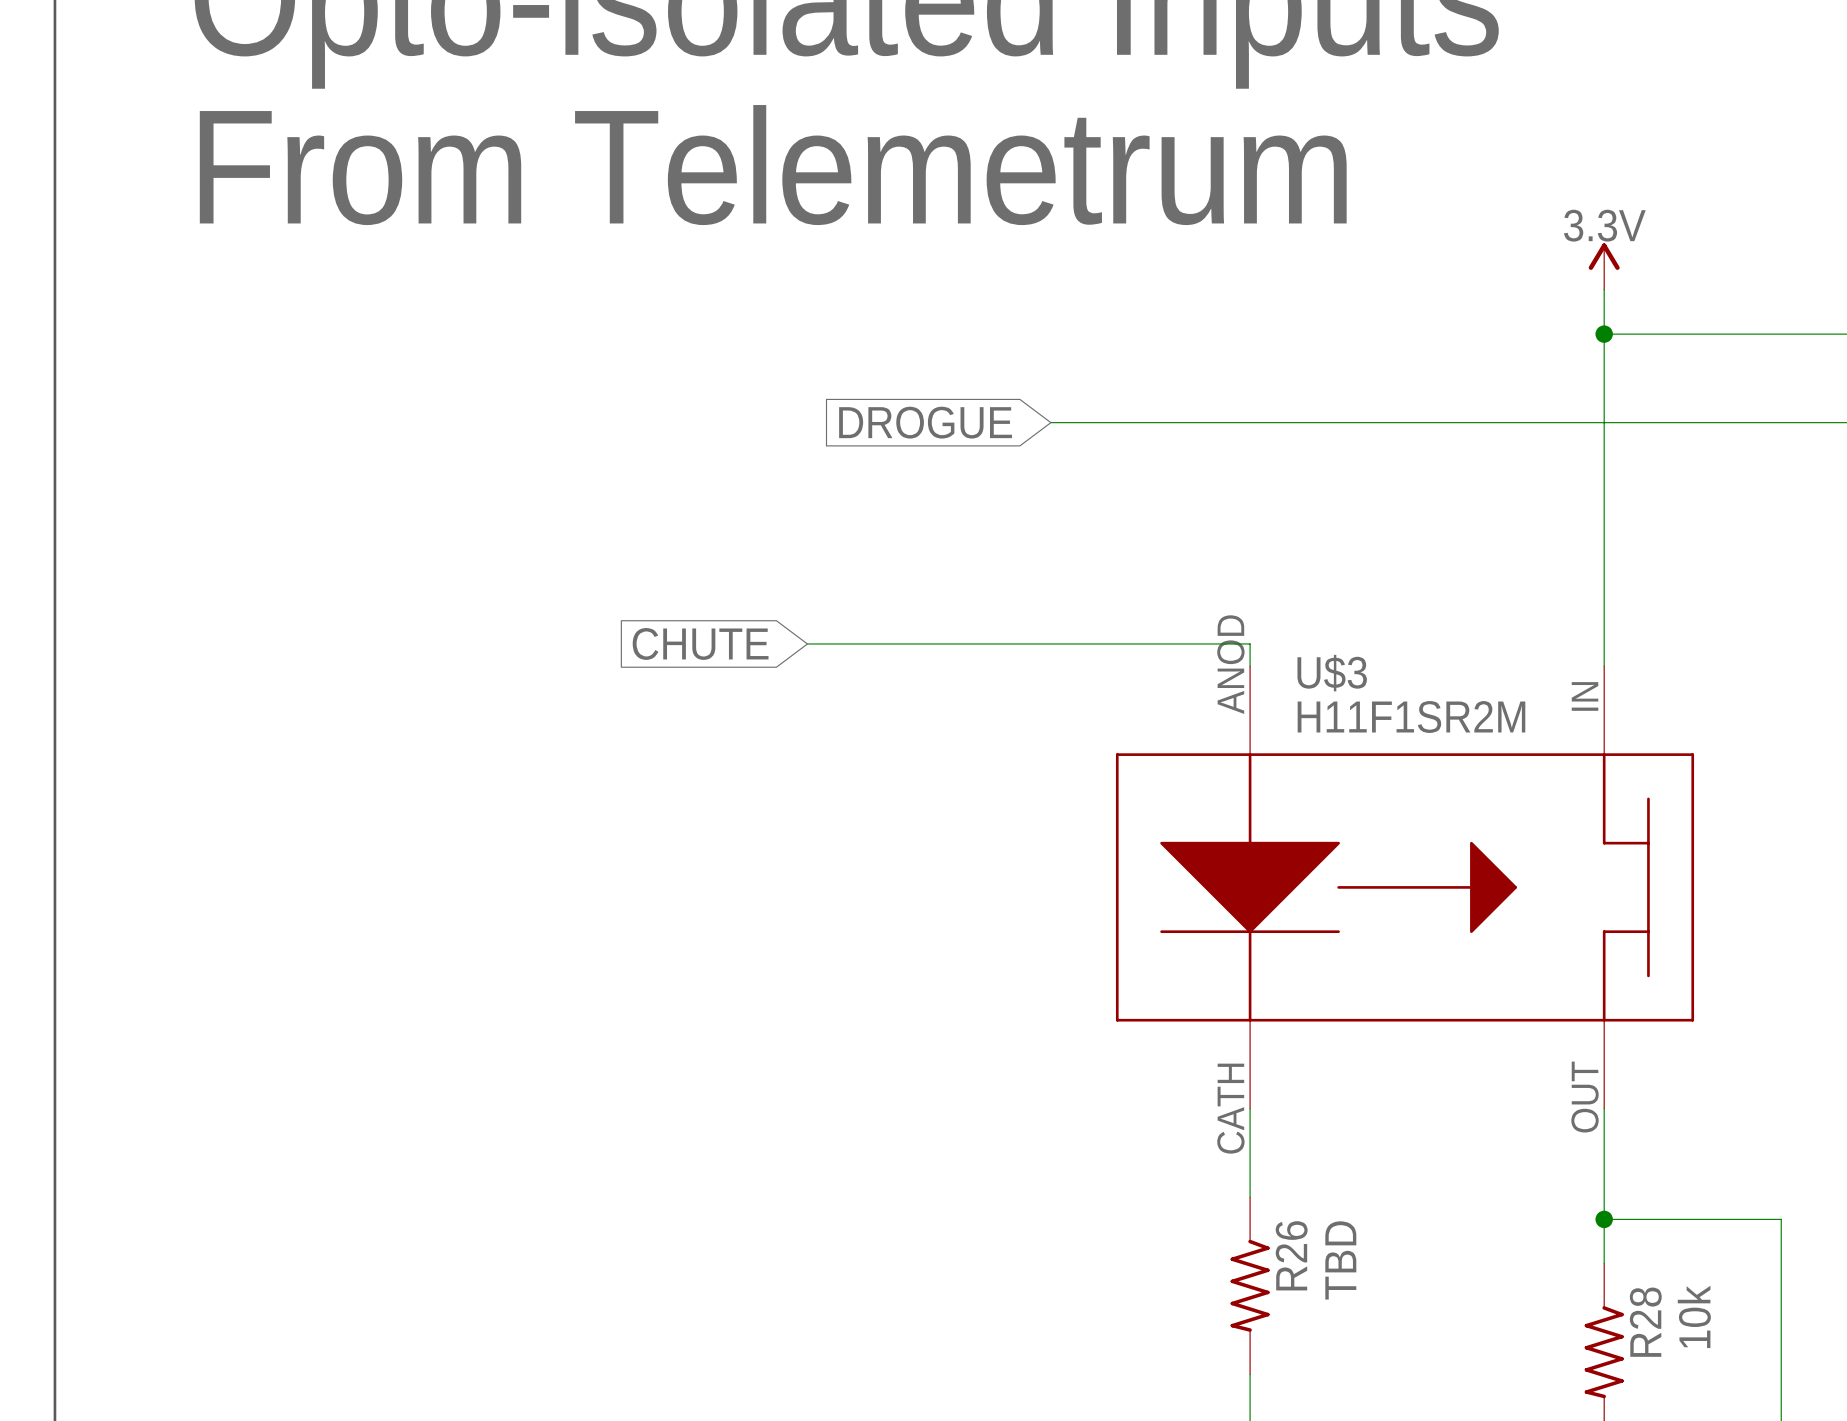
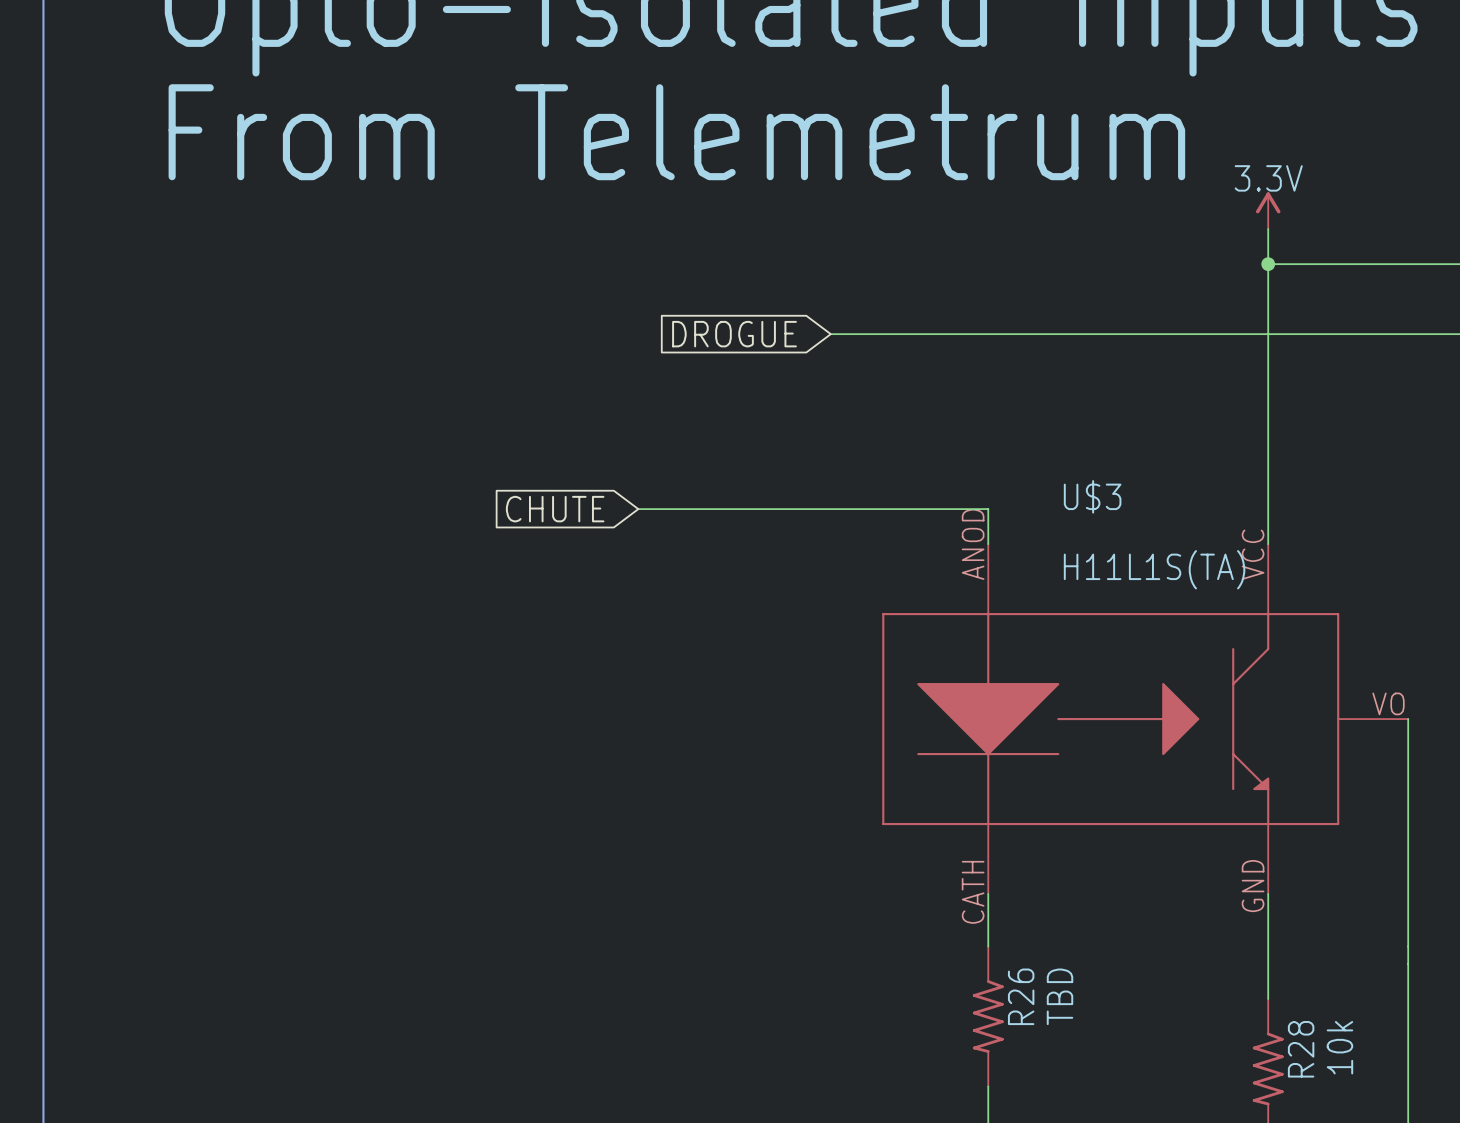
U$3 symbol: [1115, 666, 1695, 1109] -> [882, 544, 1409, 895]
U$3 name position: U$3 (1332, 673) -> U$3 (1092, 496)
U$3 value: H11F1SR2M (1411, 716) -> H11L1S(TA) (1154, 569)
wire: (1604, 1219) (1781, 1219) -> (1408, 719) (1408, 964)
junction: (1604, 1219) -> none

